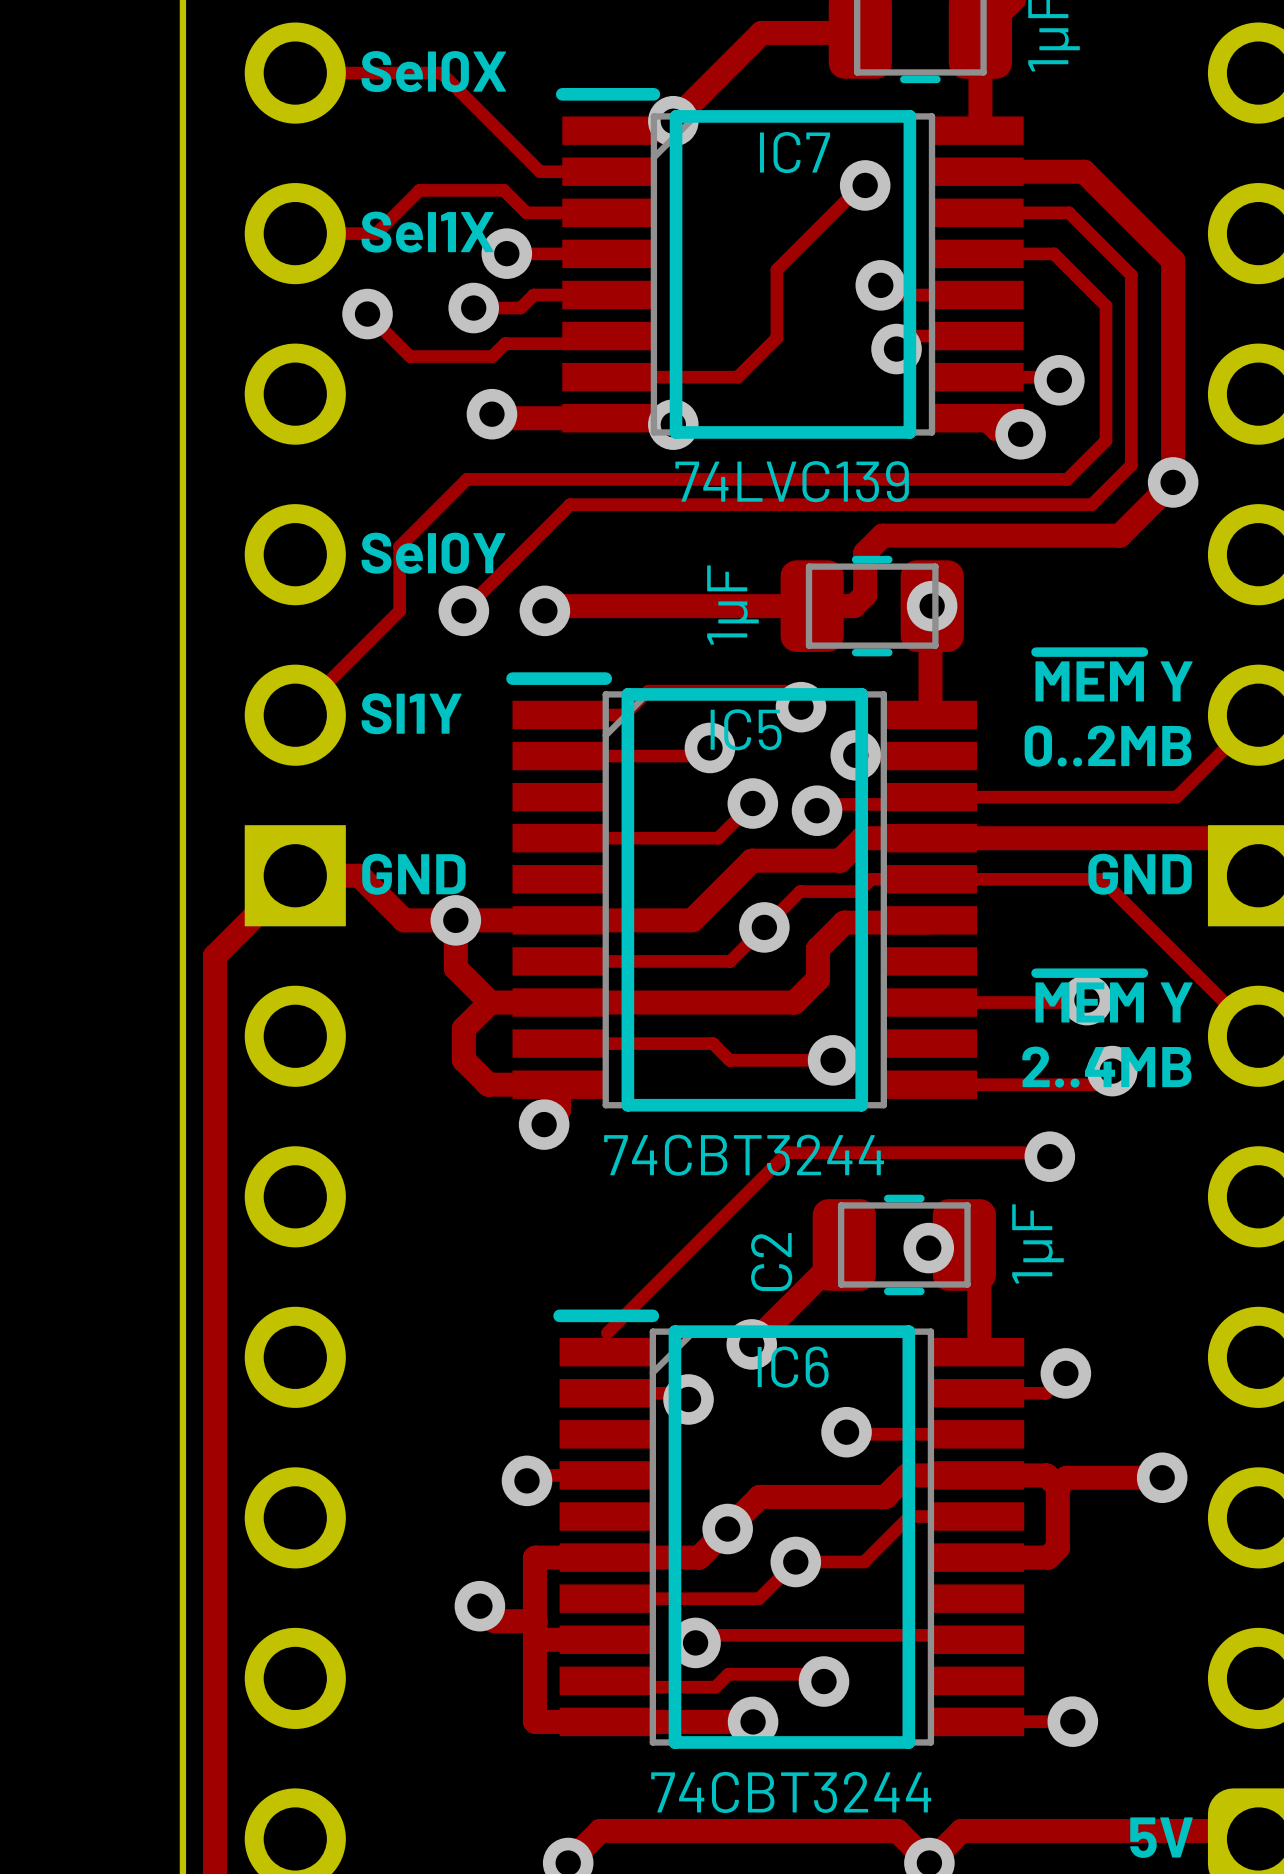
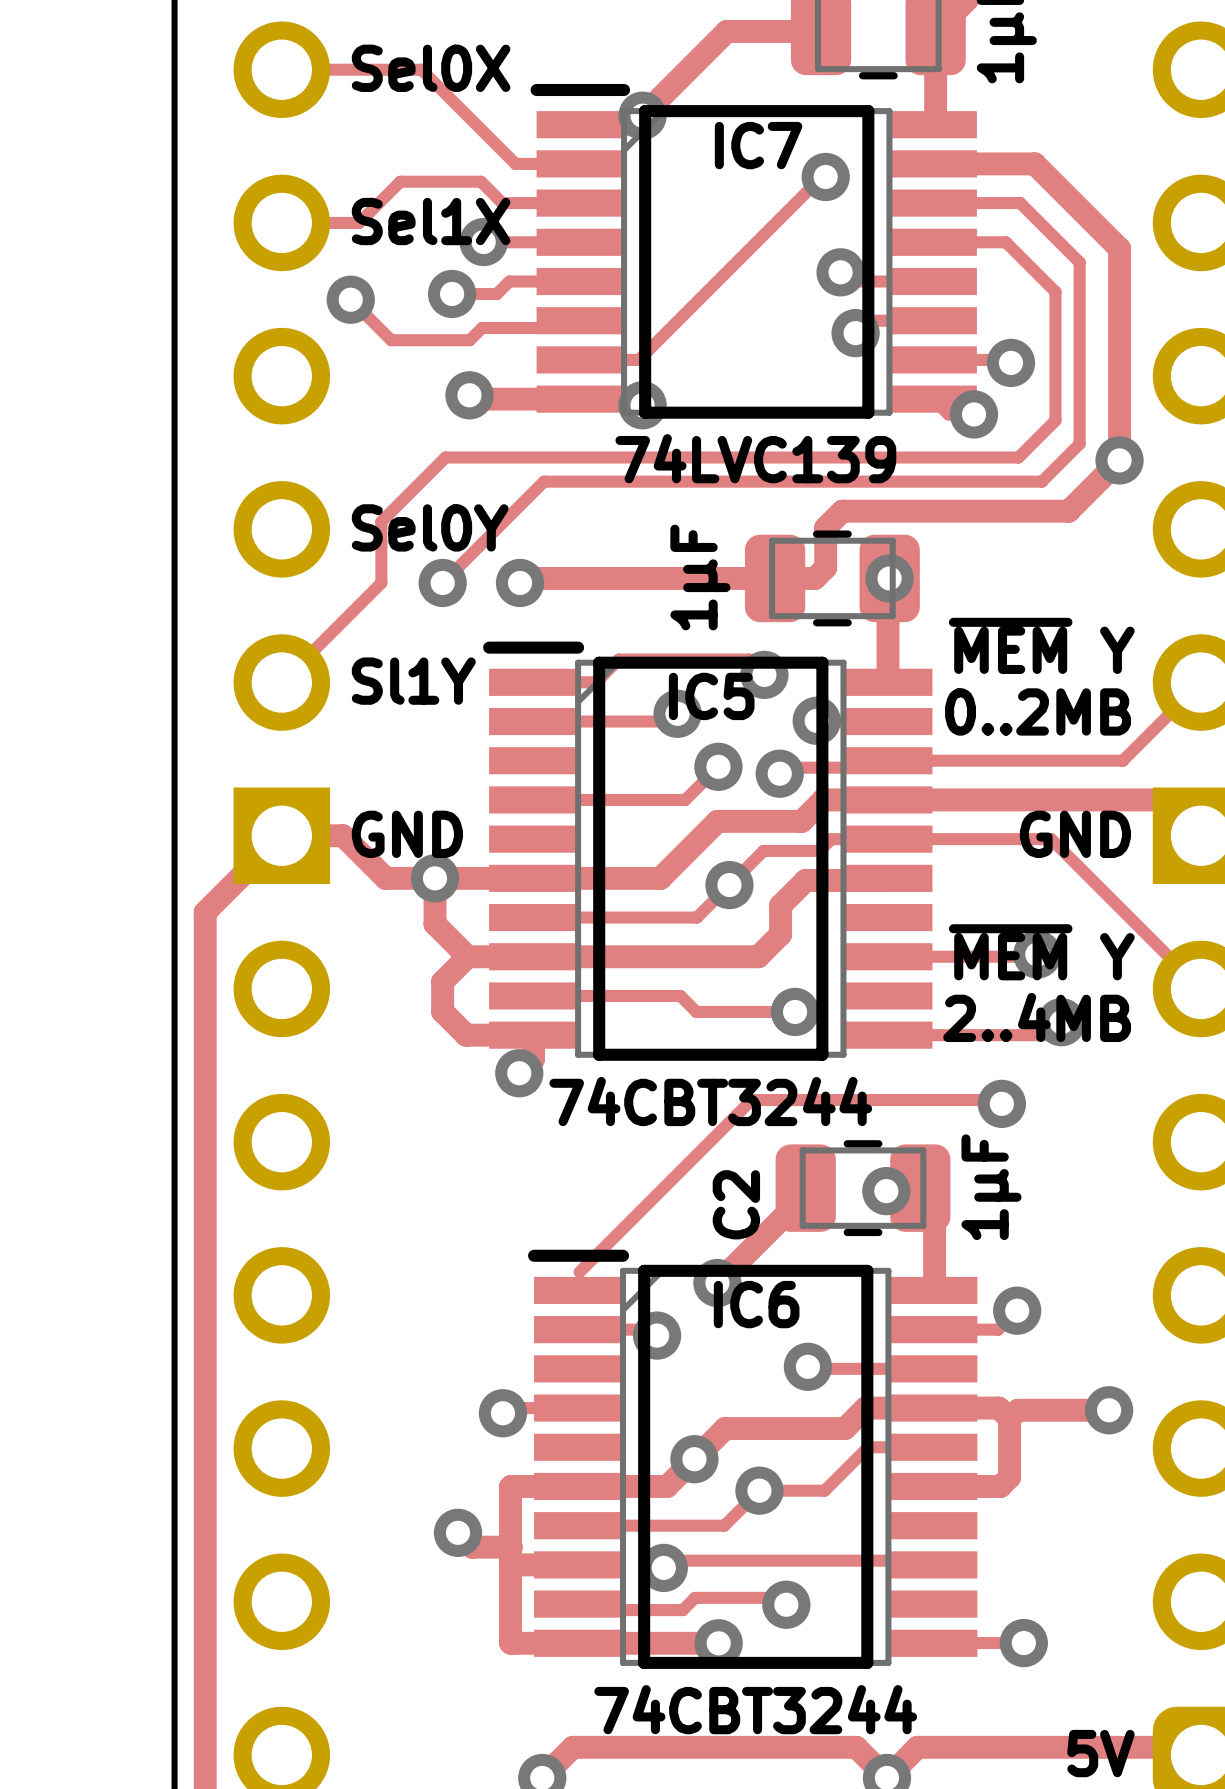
track: (776, 269) (776, 337) (737, 377) (669, 377) -> (741, 257) (638, 359)

